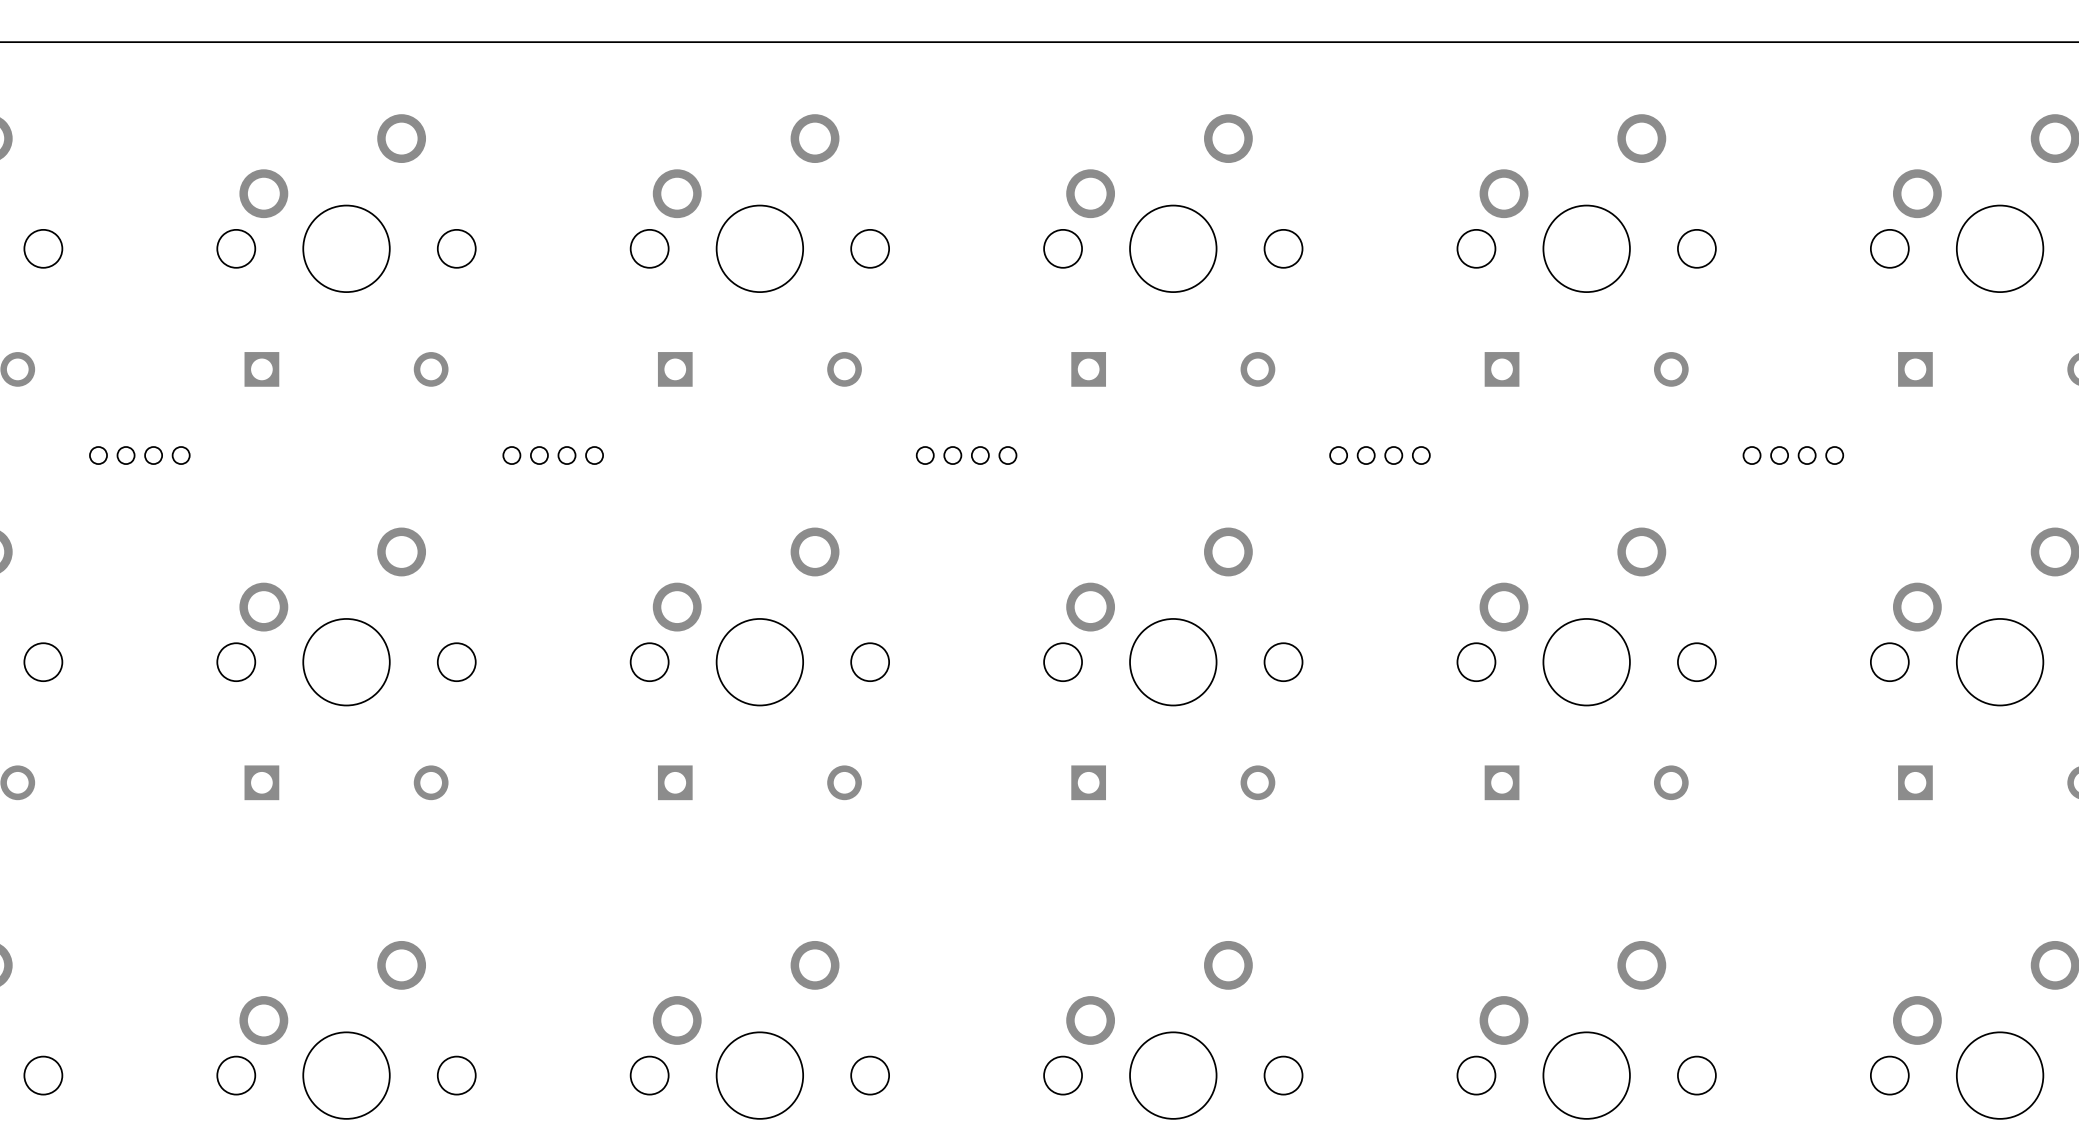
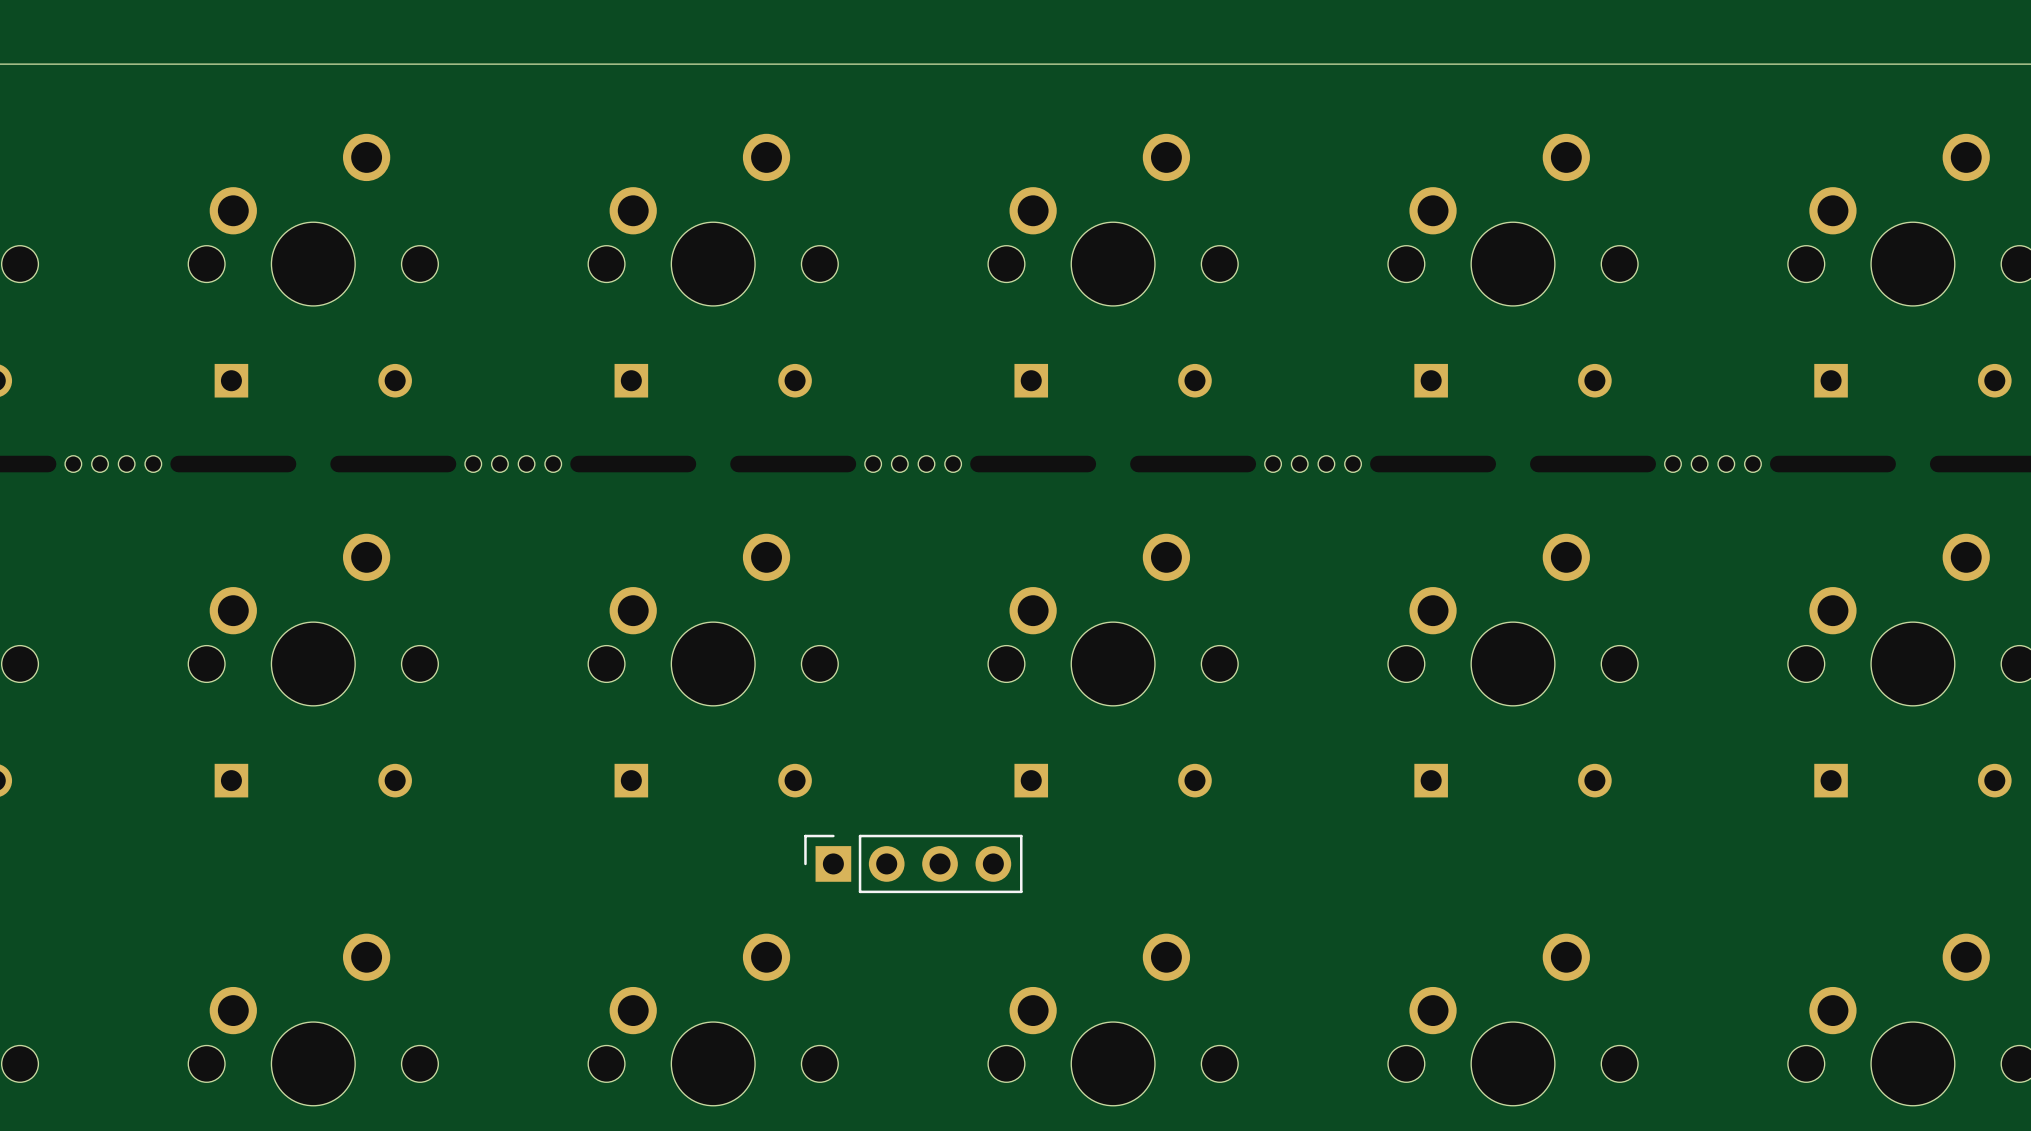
part: none -> (913, 863)

